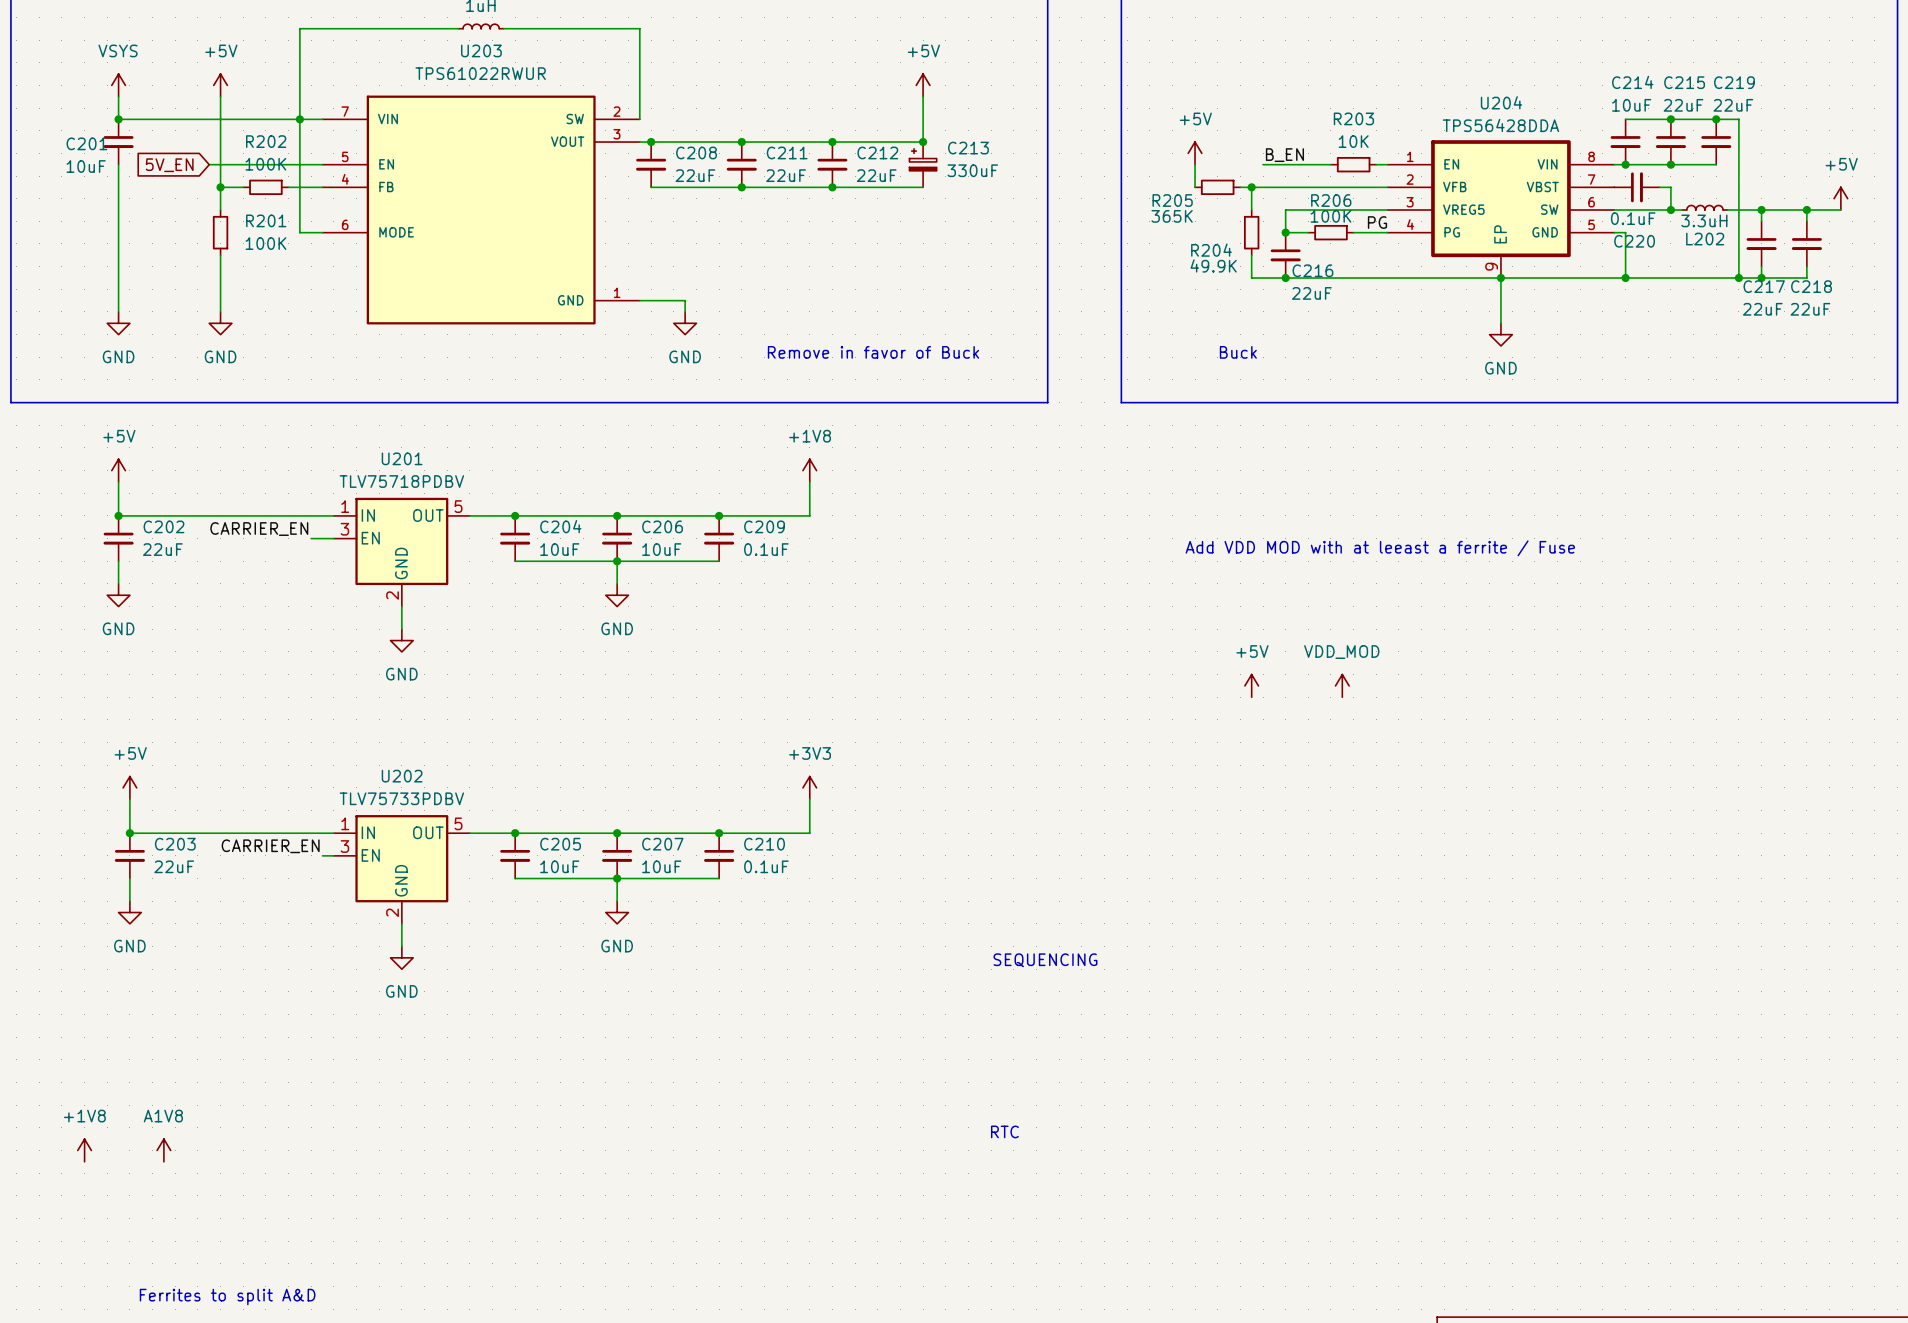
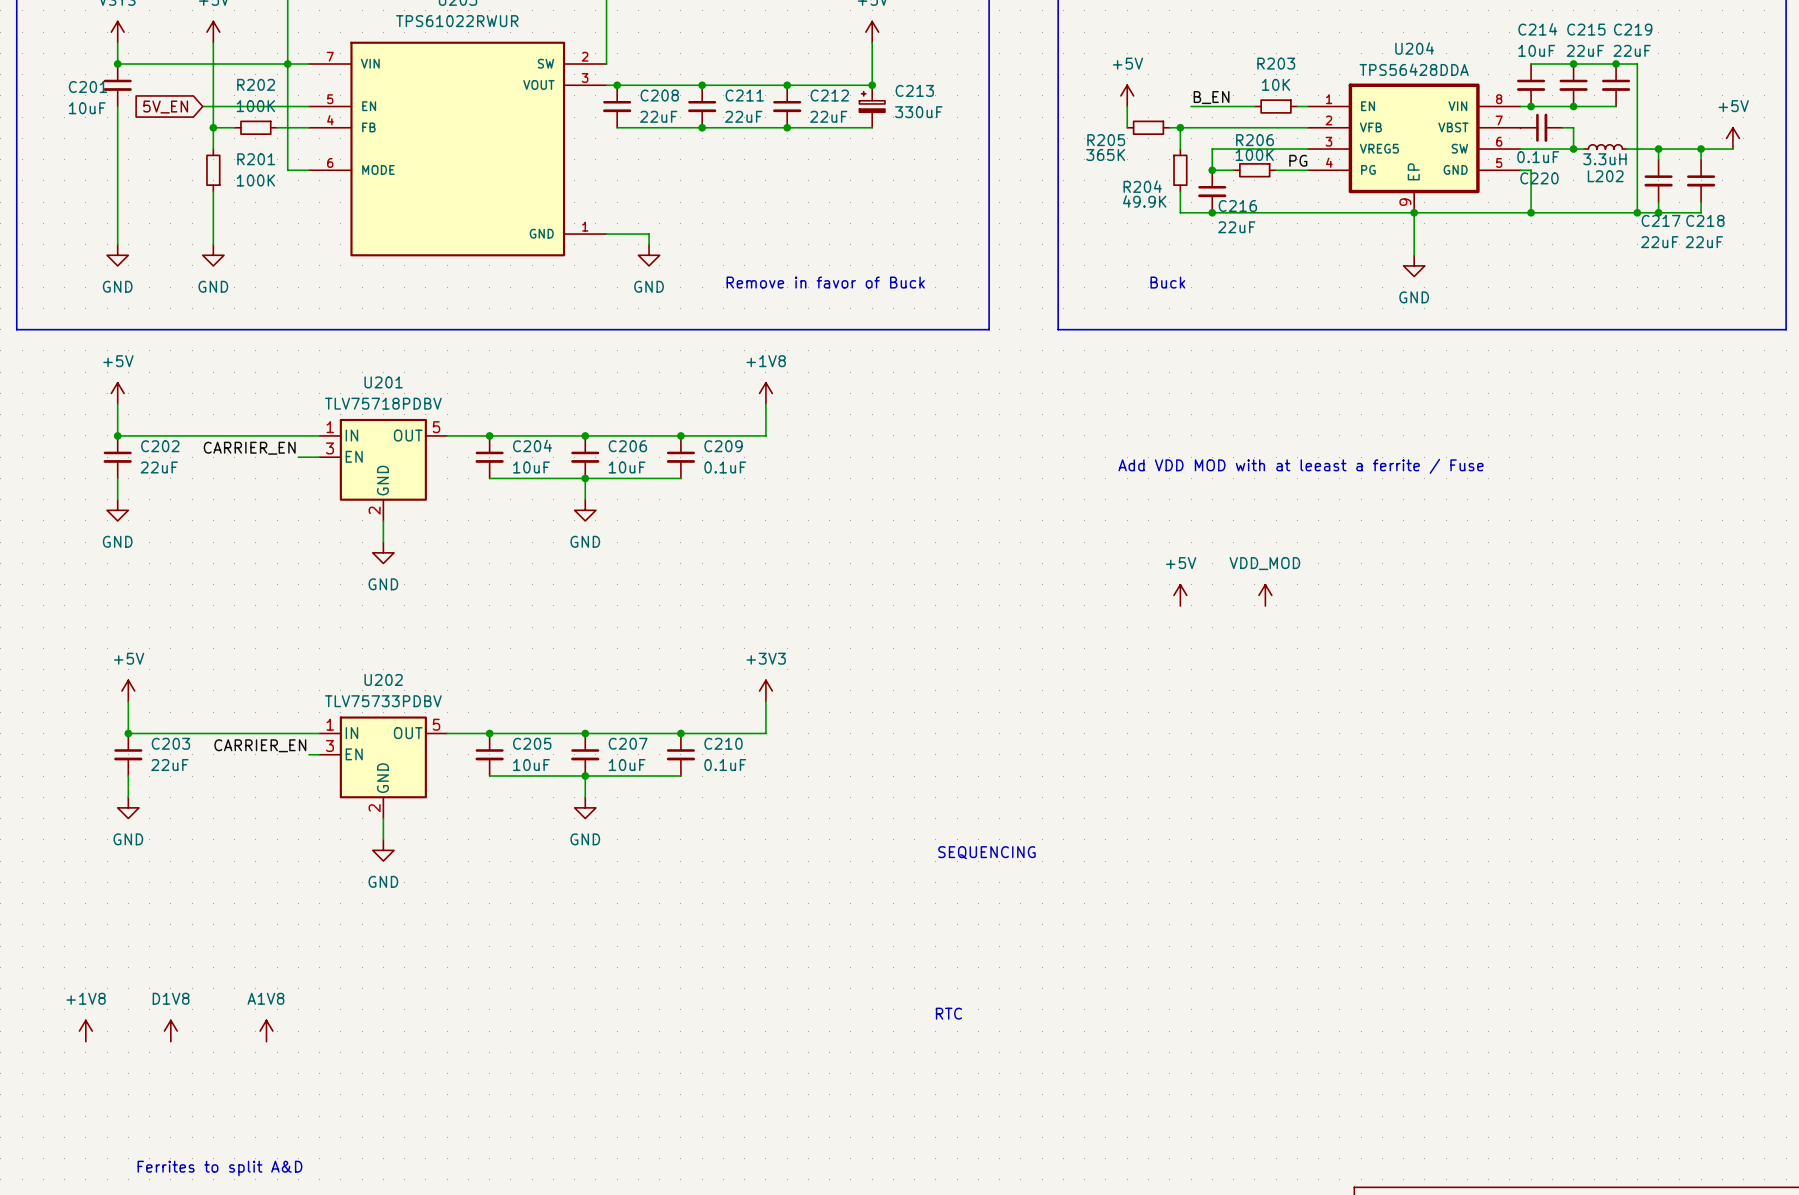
power symbol position: A1V8 (163, 1150) -> A1V8 (266, 1031)
power symbol: none -> D1V8 (170, 1031)

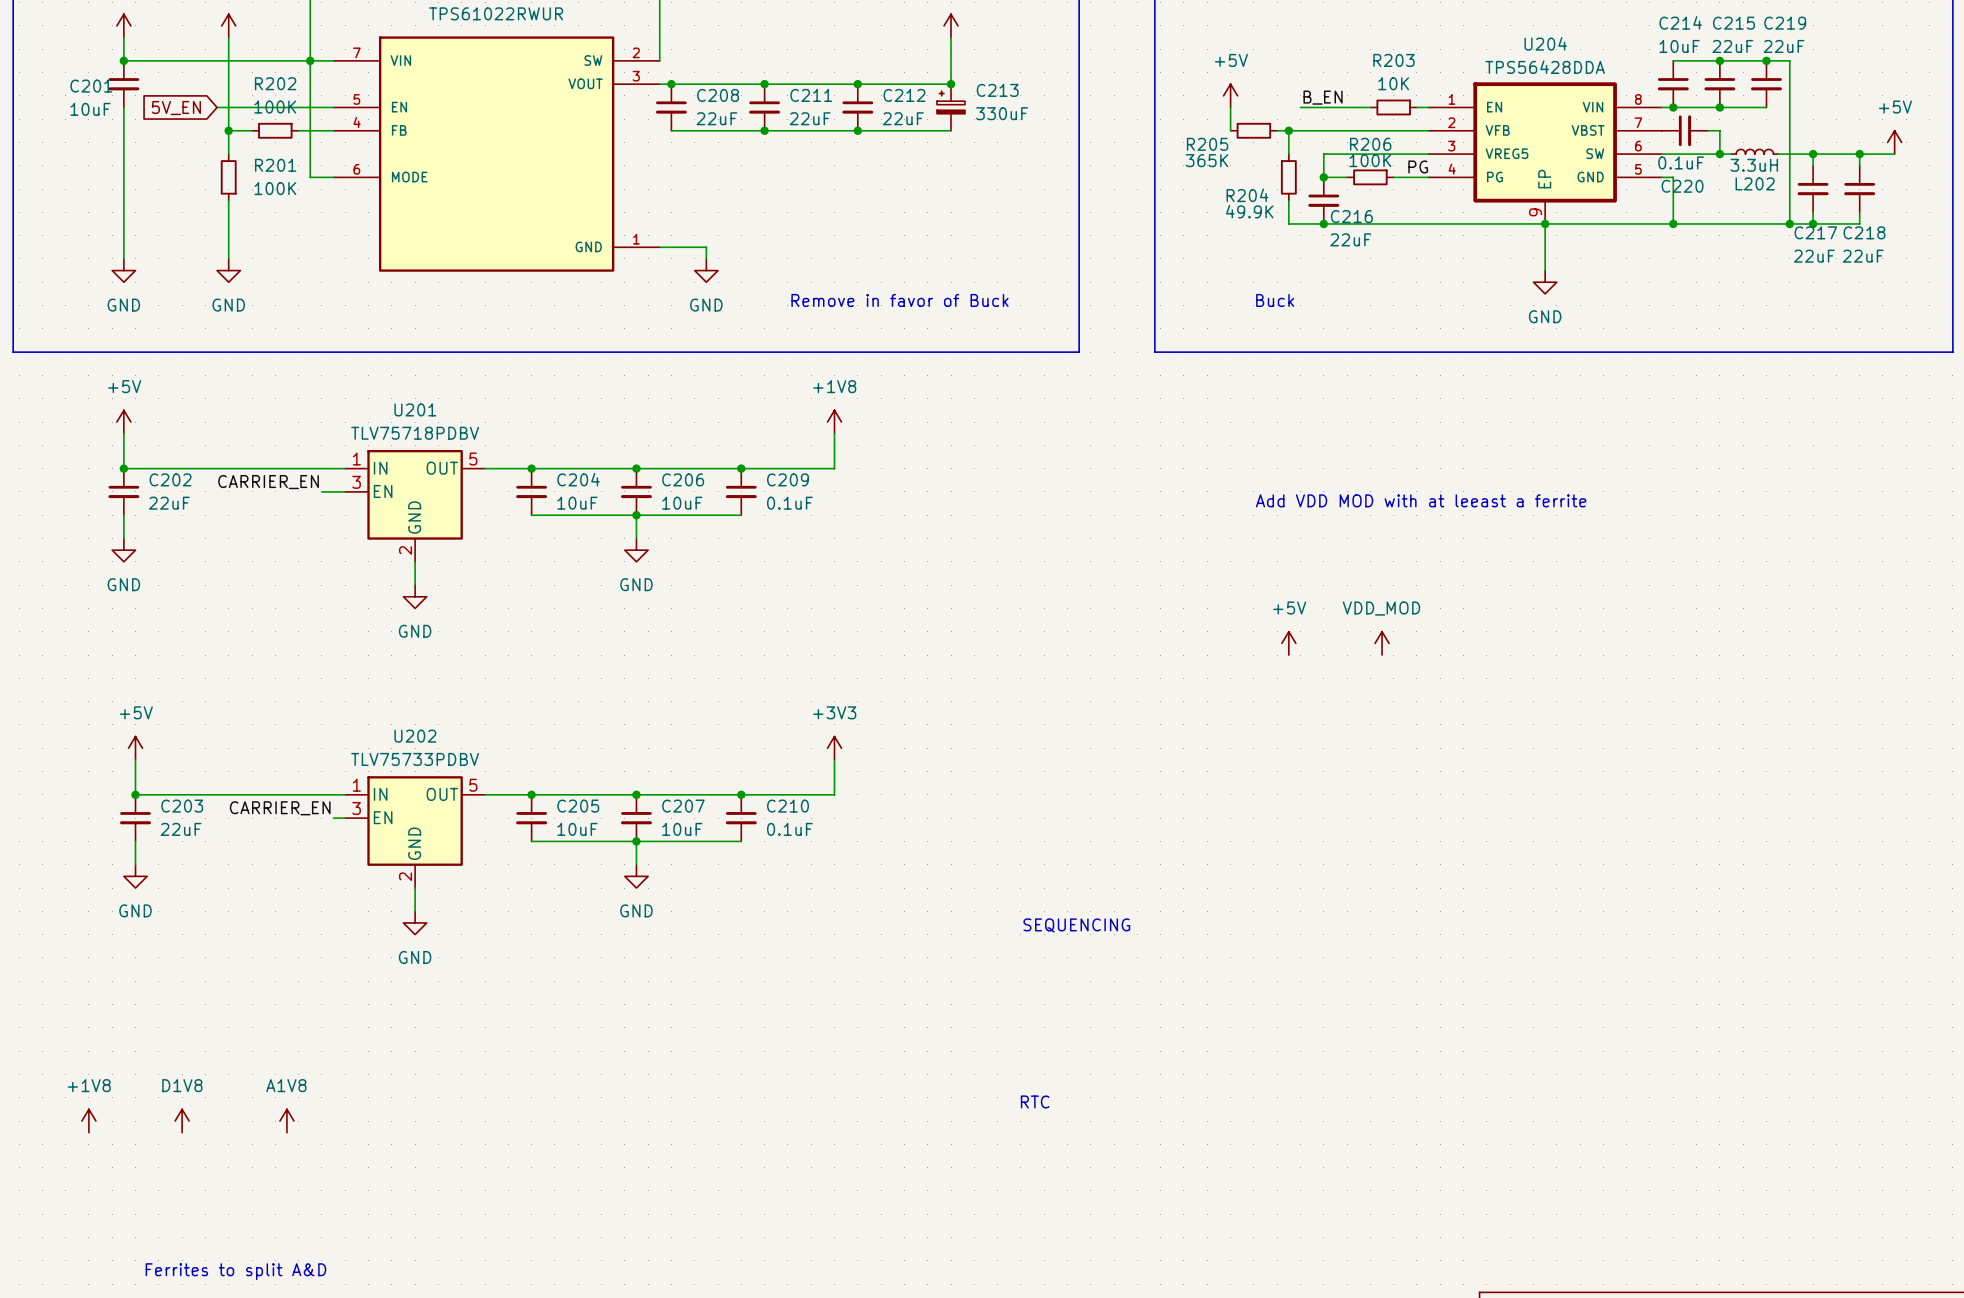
text: Add VDD MOD with at leeast a ferrite / Fuse (1301, 466) -> Add VDD MOD with at leeast a ferrite (1421, 500)

